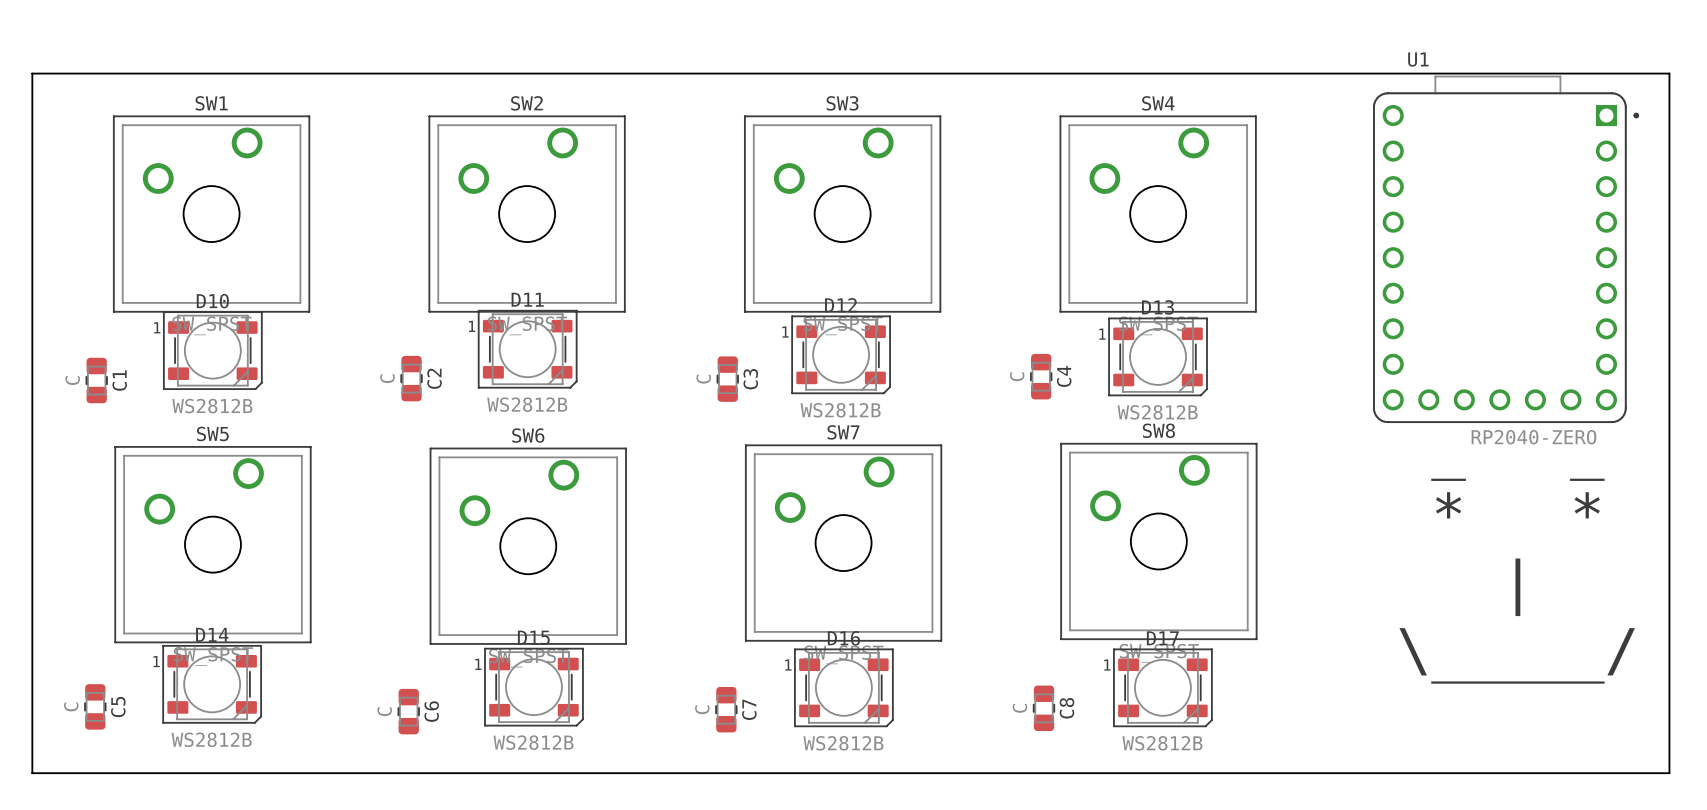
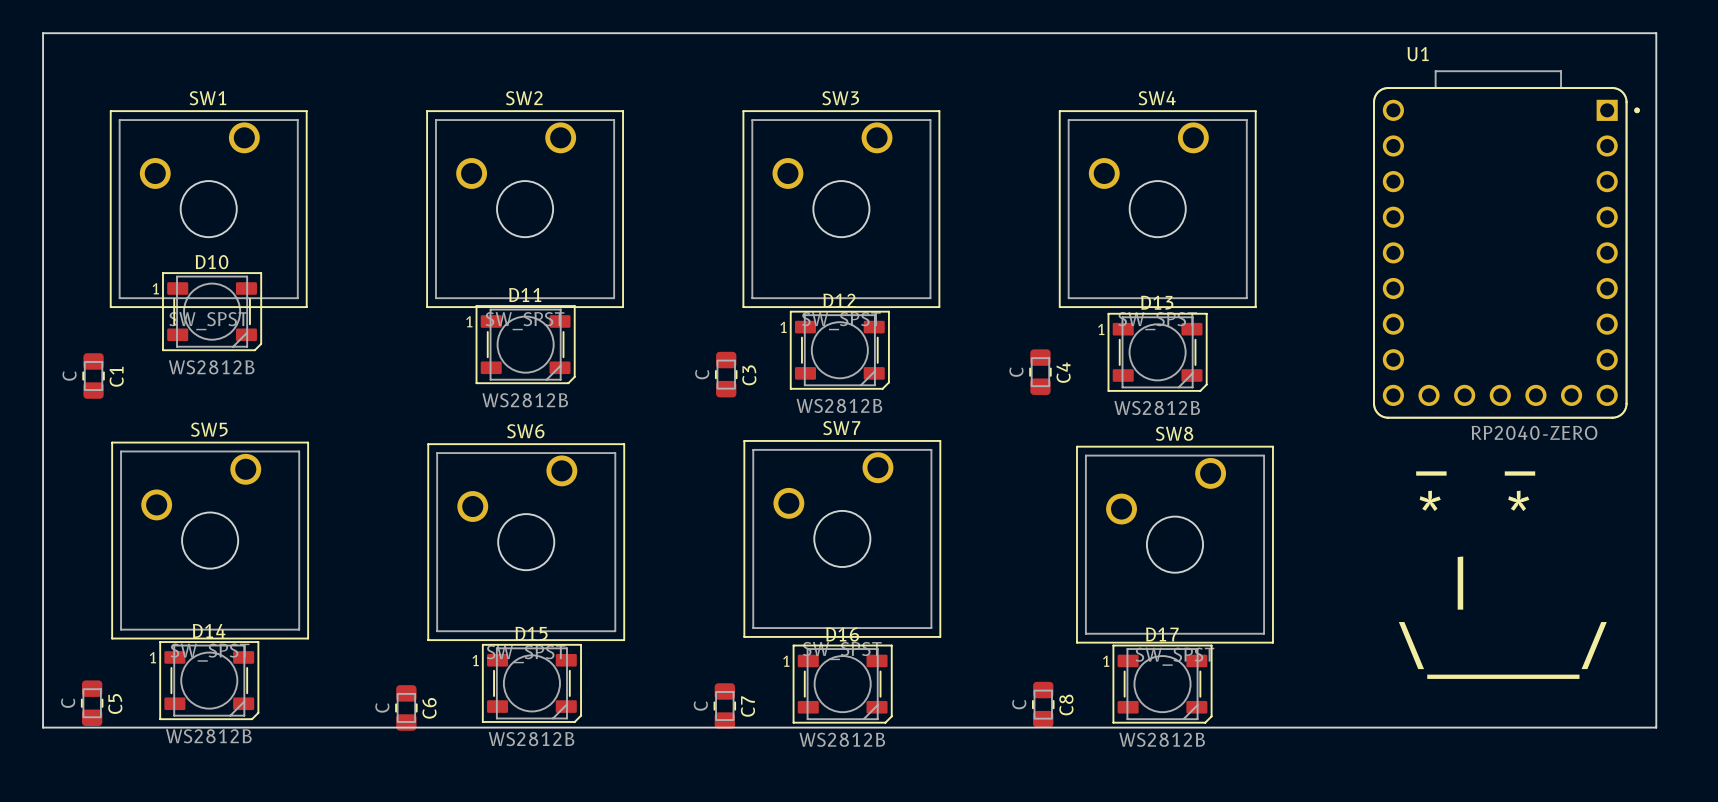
board edge: (32, 73) (1669, 73) (1669, 773) (32, 773) (32, 73) -> (43, 33) (43, 727) (1656, 727) (1656, 33) (43, 33)
D10 position: (212, 350) -> (212, 311)
C2: C (411, 378) -> none
SW8 position: (1158, 541) -> (1174, 544)

